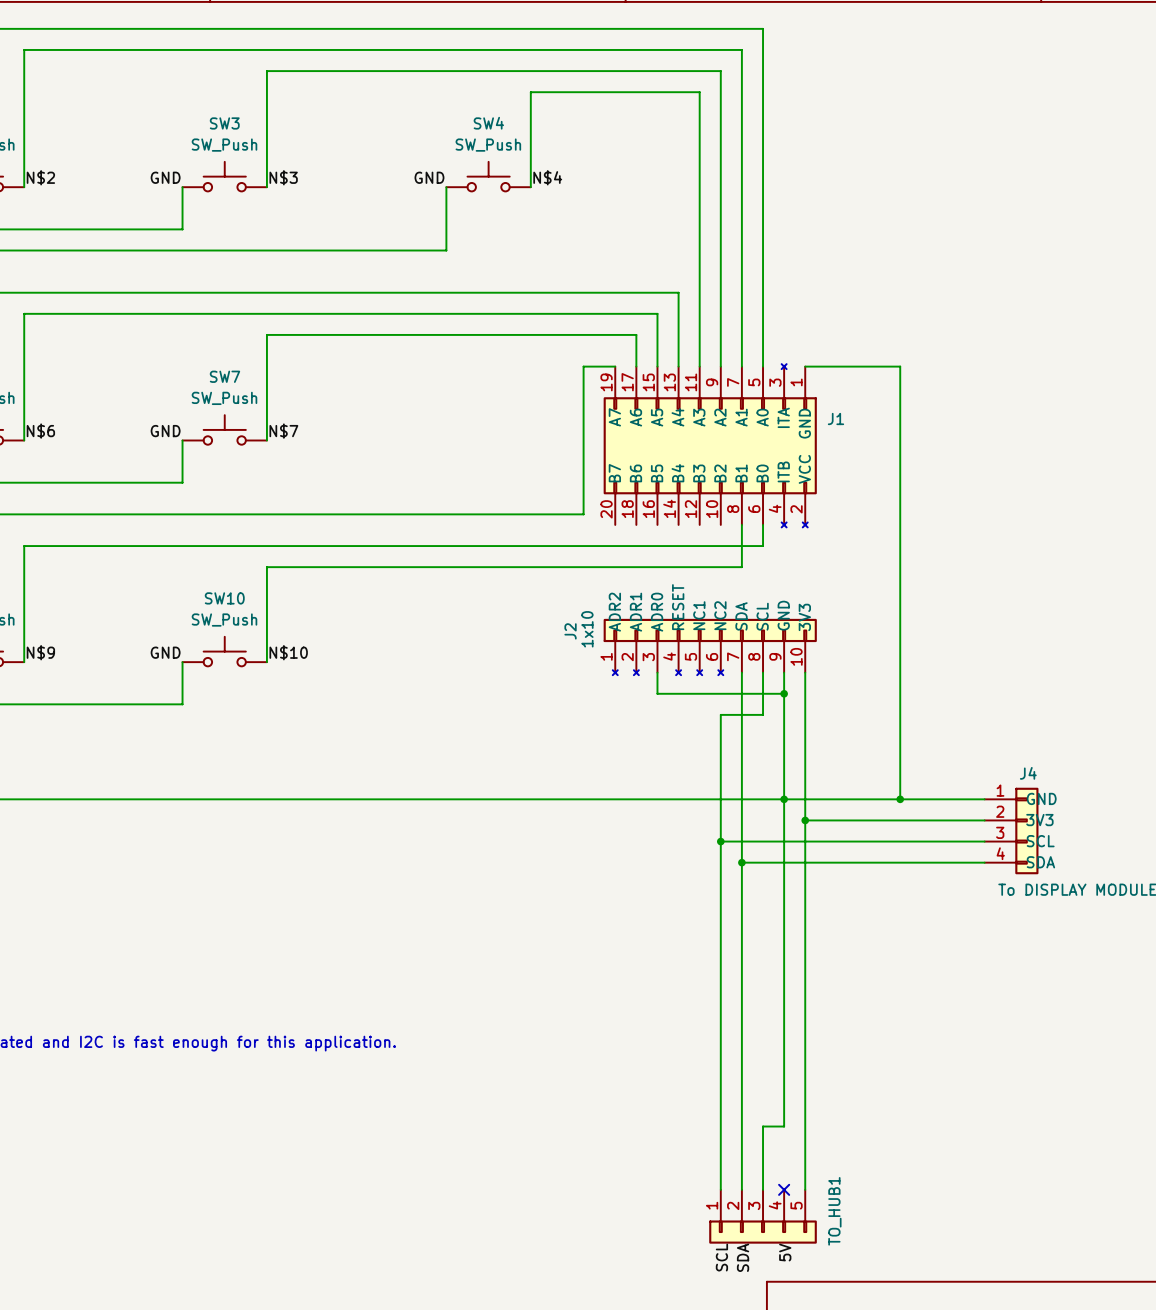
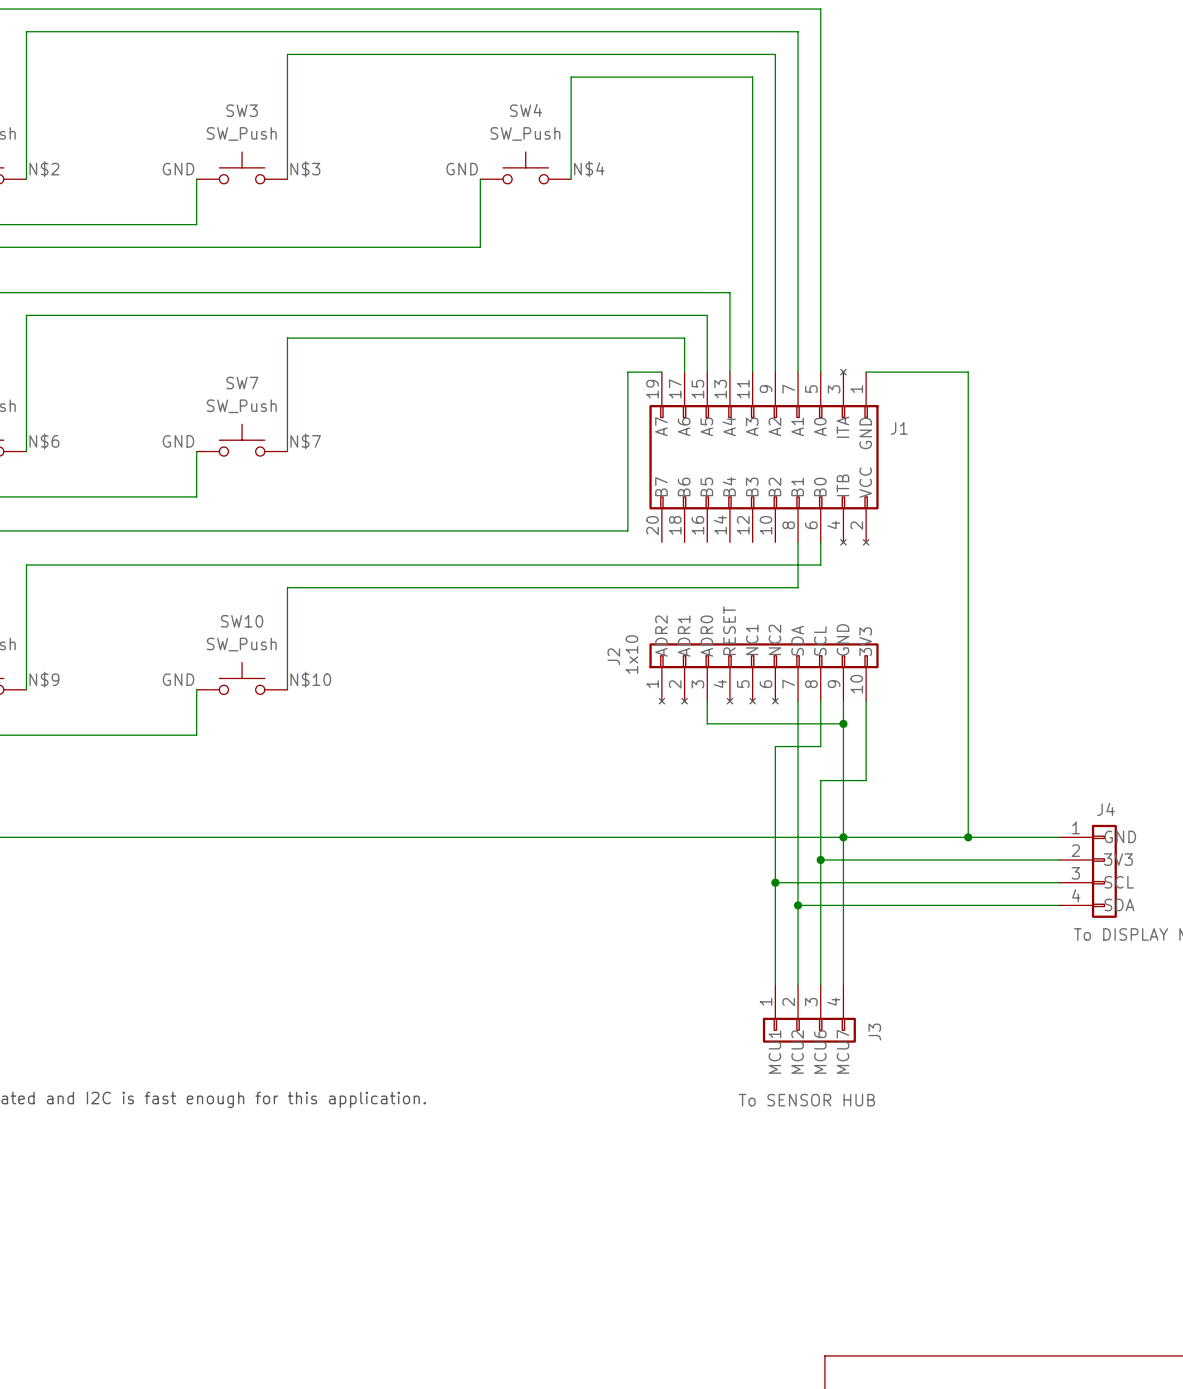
wire: (805, 746) (805, 1189) -> (866, 780) (820, 780) (820, 984)
wire: none -> (820, 860) (866, 860)
junction position: (805, 820) -> (820, 860)
wire: (720, 936) (720, 1189) -> none
wire: (741, 936) (741, 1189) -> none
wire: (784, 936) (784, 1126) (763, 1126) (763, 1189) -> none
J3: none -> To SENSOR HUB (809, 1013)
no-connect mark: (784, 1189) -> none
TO_HUB1: (763, 1216) -> none
label: 5V (785, 1252) -> none
label: SCL (721, 1257) -> none
label: SDA (743, 1257) -> none

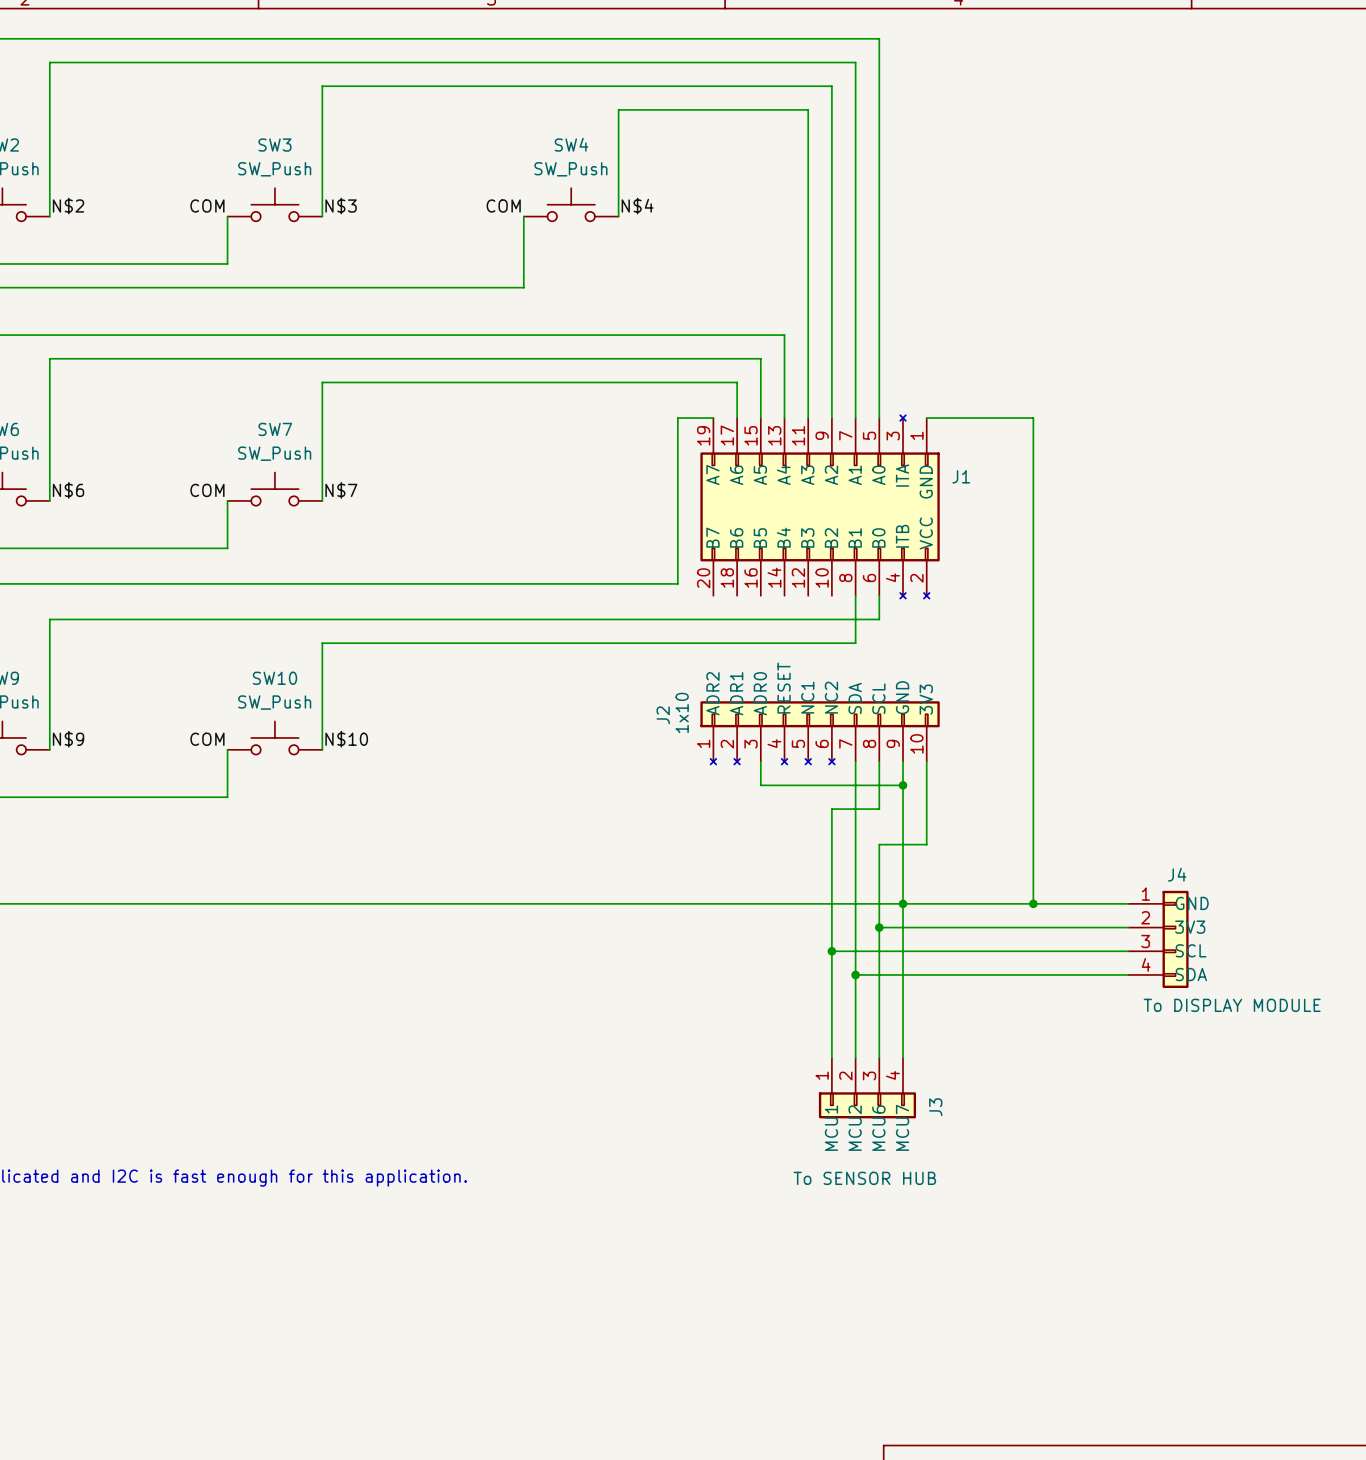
label: GND (178, 169) -> COM (207, 206)
label: GND (462, 169) -> COM (503, 206)
label: GND (178, 441) -> COM (207, 490)
label: GND (178, 679) -> COM (207, 739)

